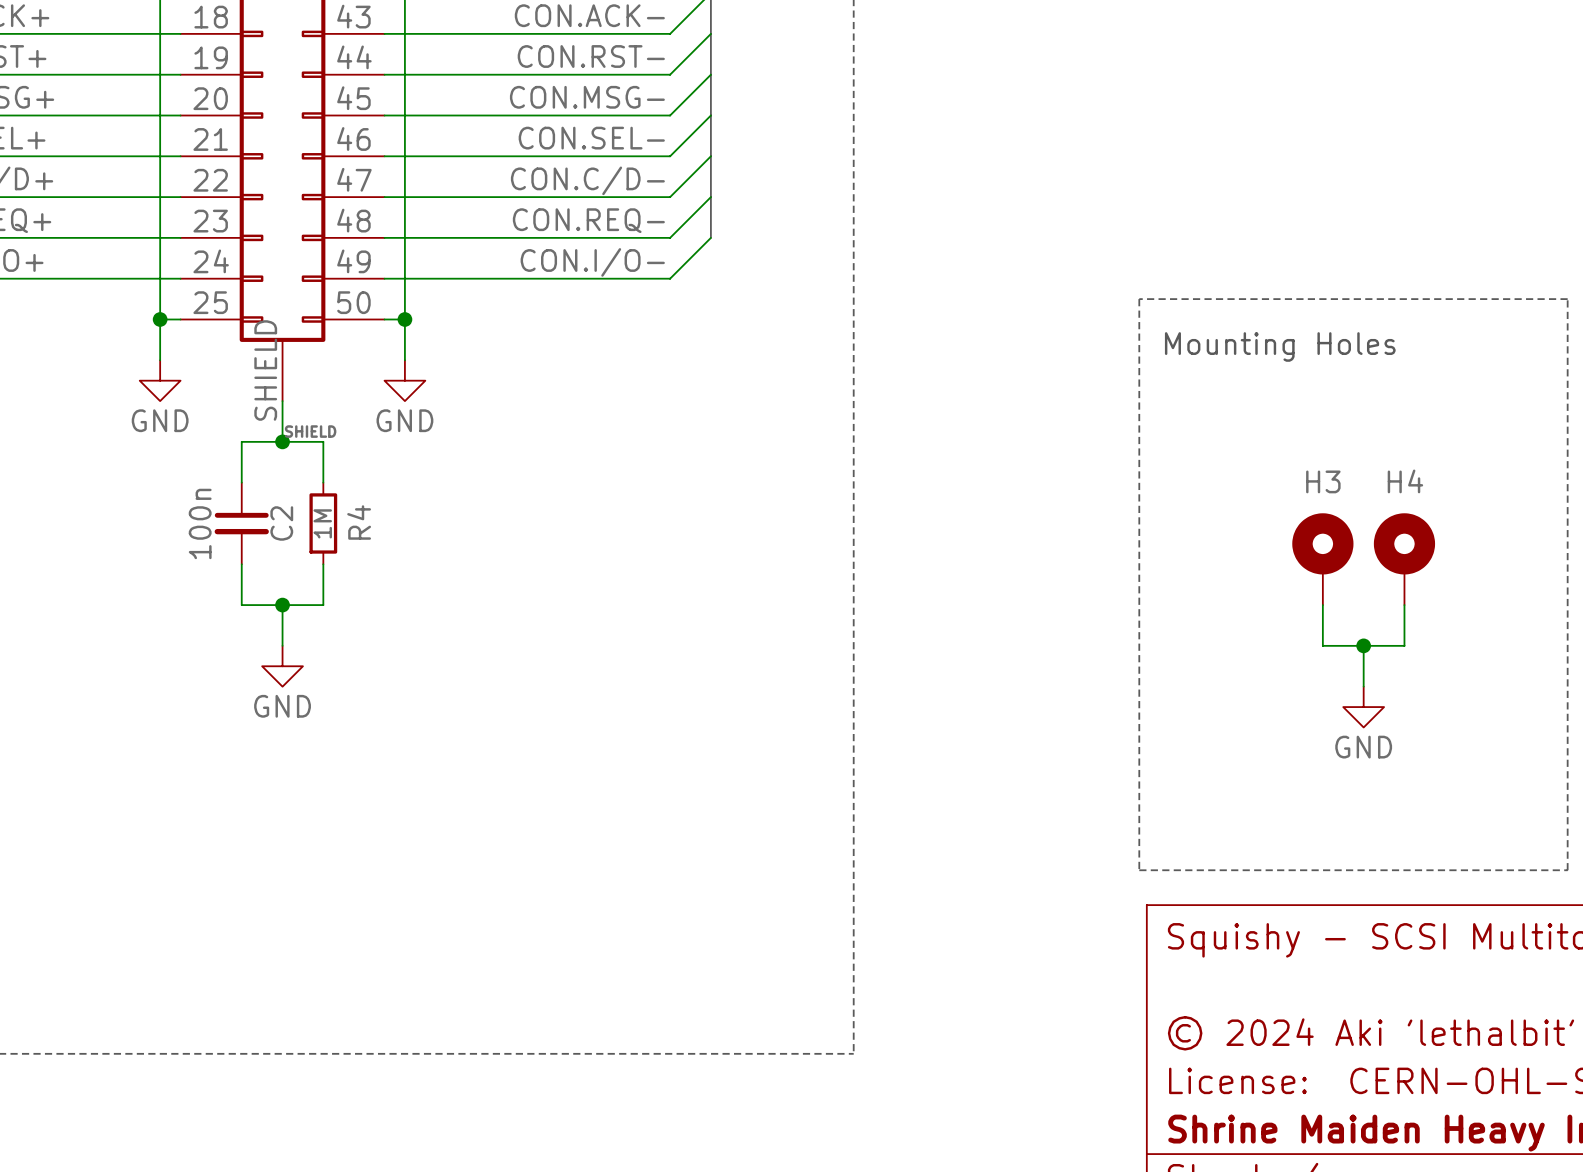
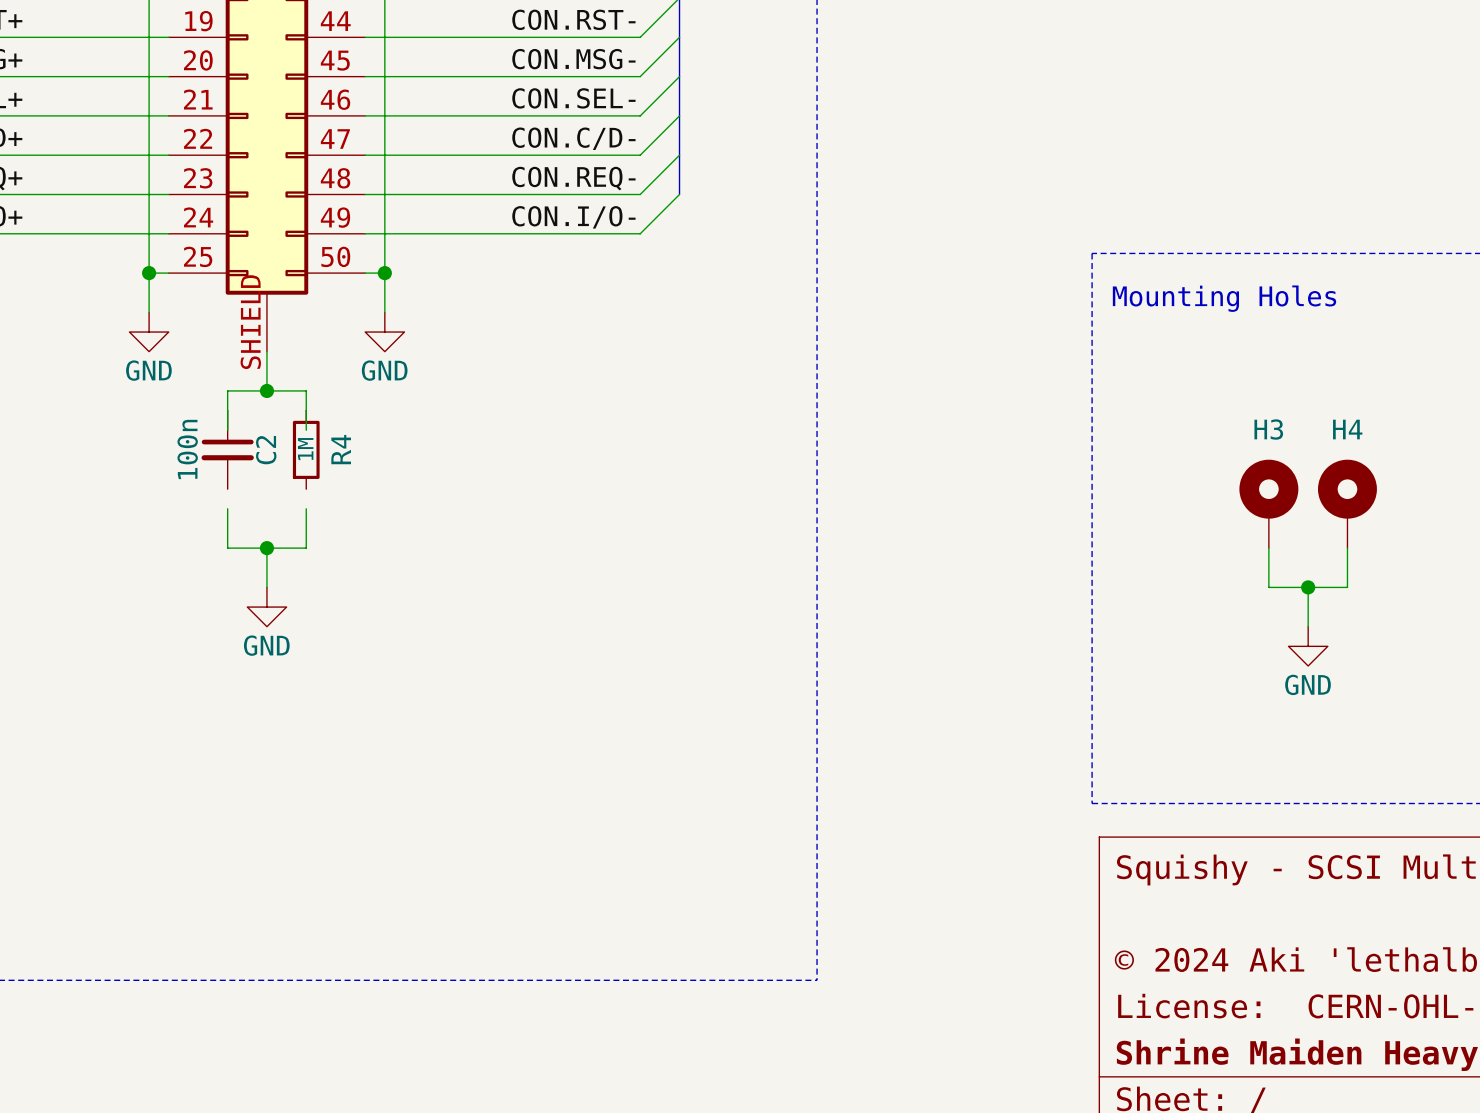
label: SHIELD (310, 431) -> none
C2 position: (241, 523) -> (227, 449)
R4 position: (323, 523) -> (306, 449)

